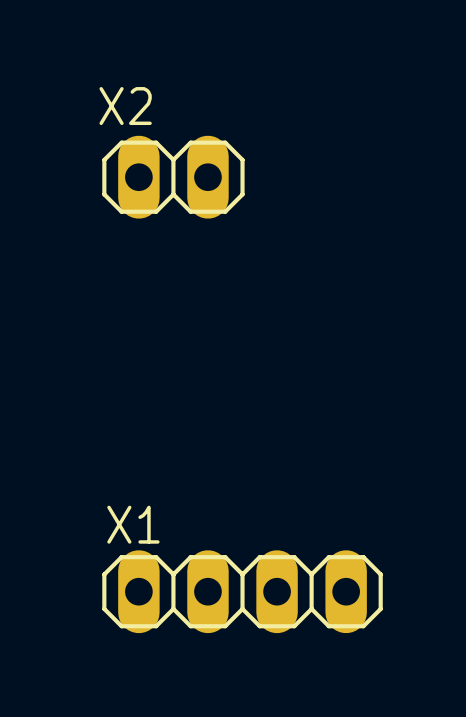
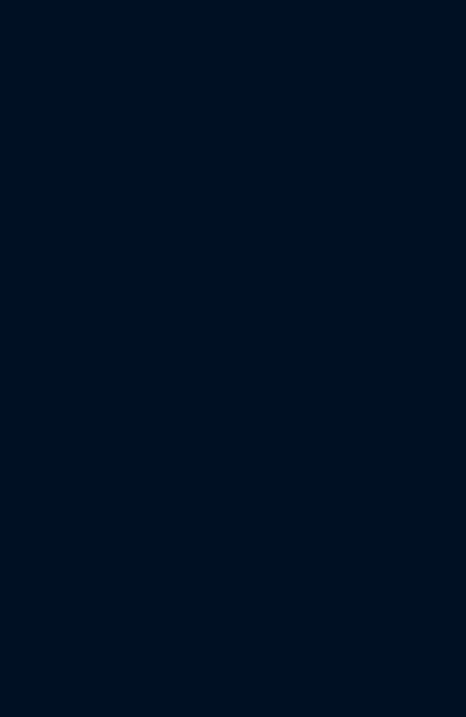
X2: (173, 177) -> none
X1: (242, 591) -> none

